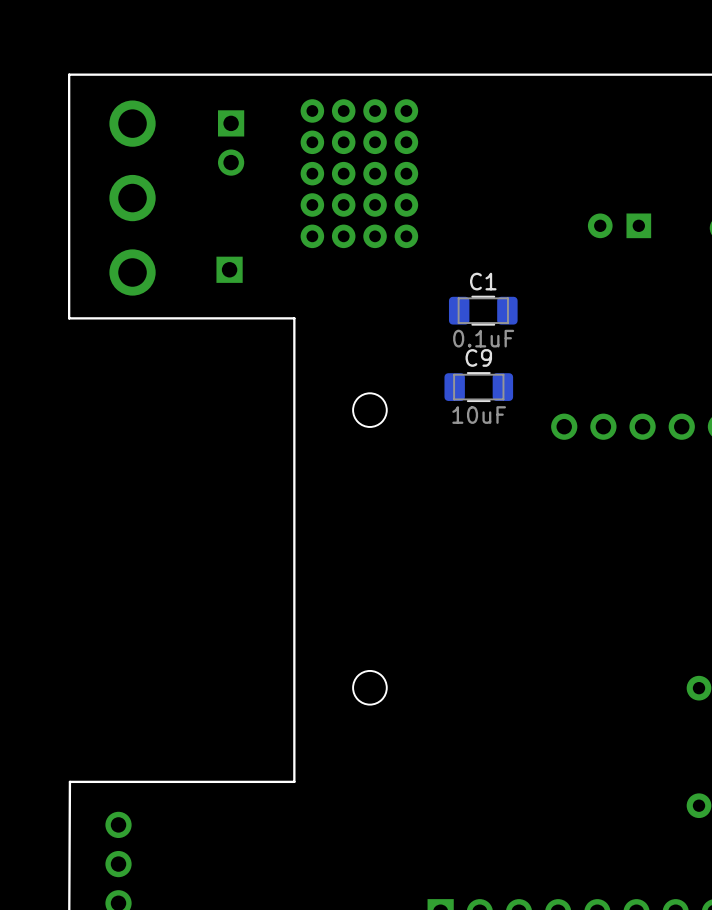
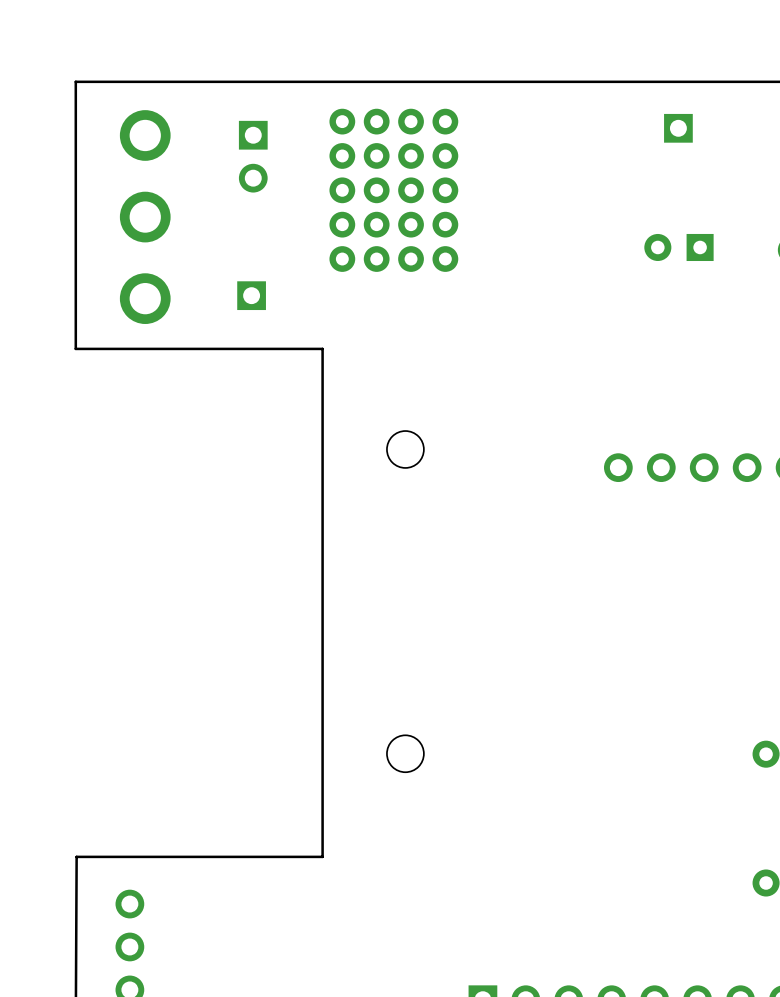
part: none -> (678, 128)
C1: 0.1uF (483, 310) -> none
C9: 10uF (478, 387) -> none

